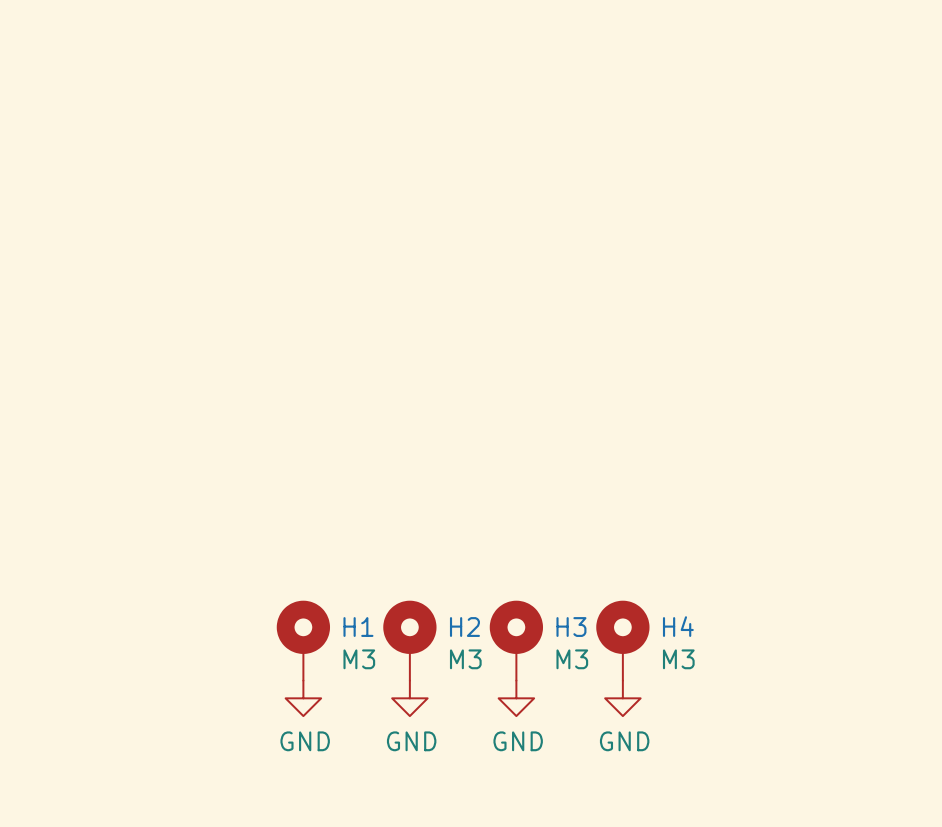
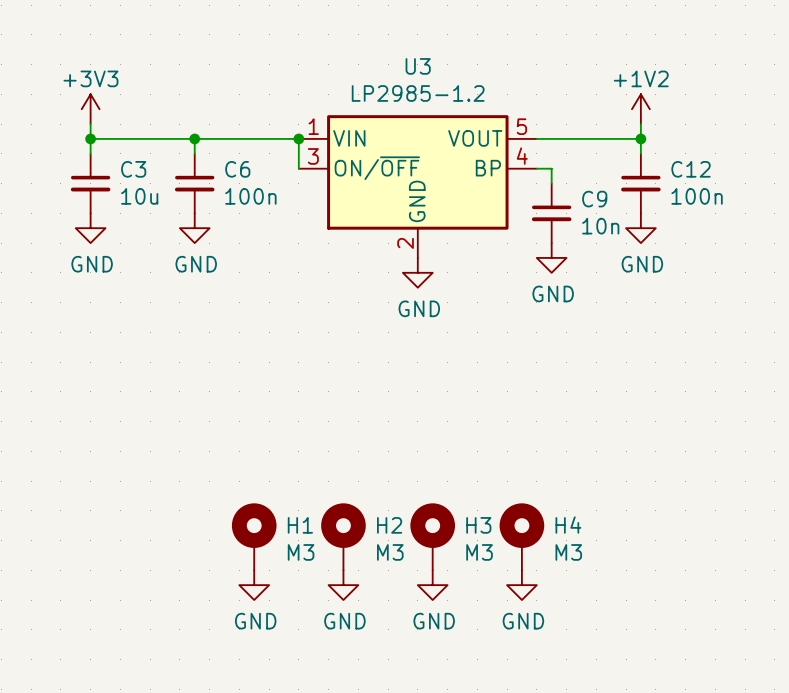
power symbol: none -> +3V3 (90, 109)
power symbol: none -> +1V2 (640, 109)
wire: none -> (90, 124) (90, 153)
wire: none -> (640, 124) (640, 153)
wire: none -> (90, 138) (298, 138) (298, 168)
junction: none -> (90, 138)
wire: none -> (194, 138) (194, 153)
junction: none -> (194, 138)
junction: none -> (298, 138)
wire: none -> (536, 138) (640, 138)
junction: none -> (640, 138)
wire: none -> (536, 168) (551, 168) (551, 183)
C3: none -> 10u (90, 183)
C6: none -> 100n (194, 183)
C12: none -> 100n (640, 183)
U3: none -> LP2985-1.2 (417, 186)
C9: none -> 10n (551, 213)
power symbol: none -> GND (90, 228)
power symbol: none -> GND (194, 228)
power symbol: none -> GND (640, 228)
power symbol: none -> GND (551, 257)
power symbol: none -> GND (417, 272)

